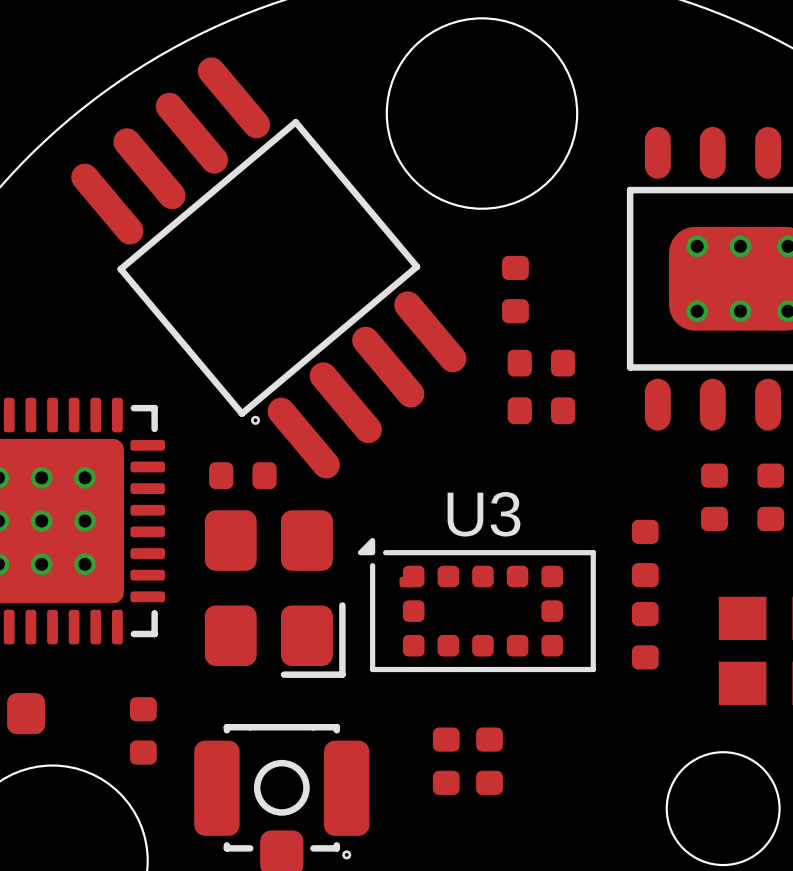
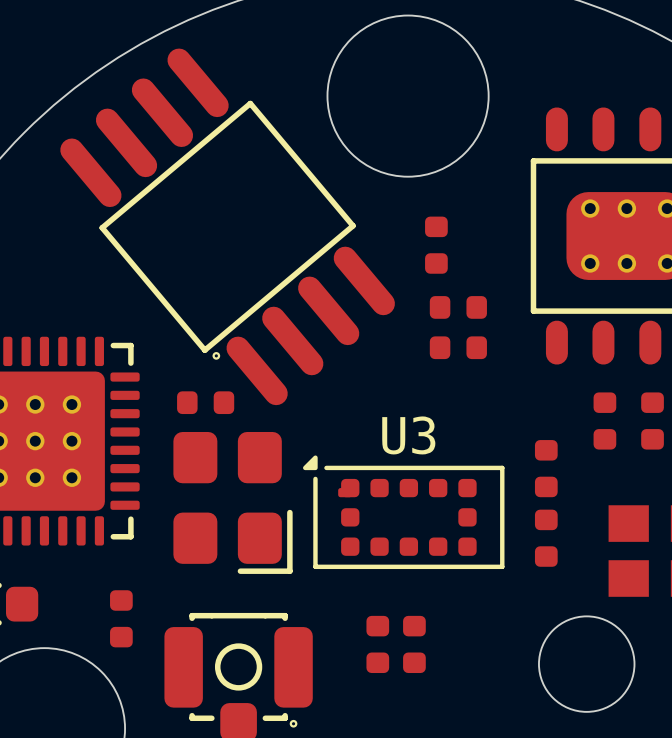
round board edge position: (723, 808) -> (586, 664)

